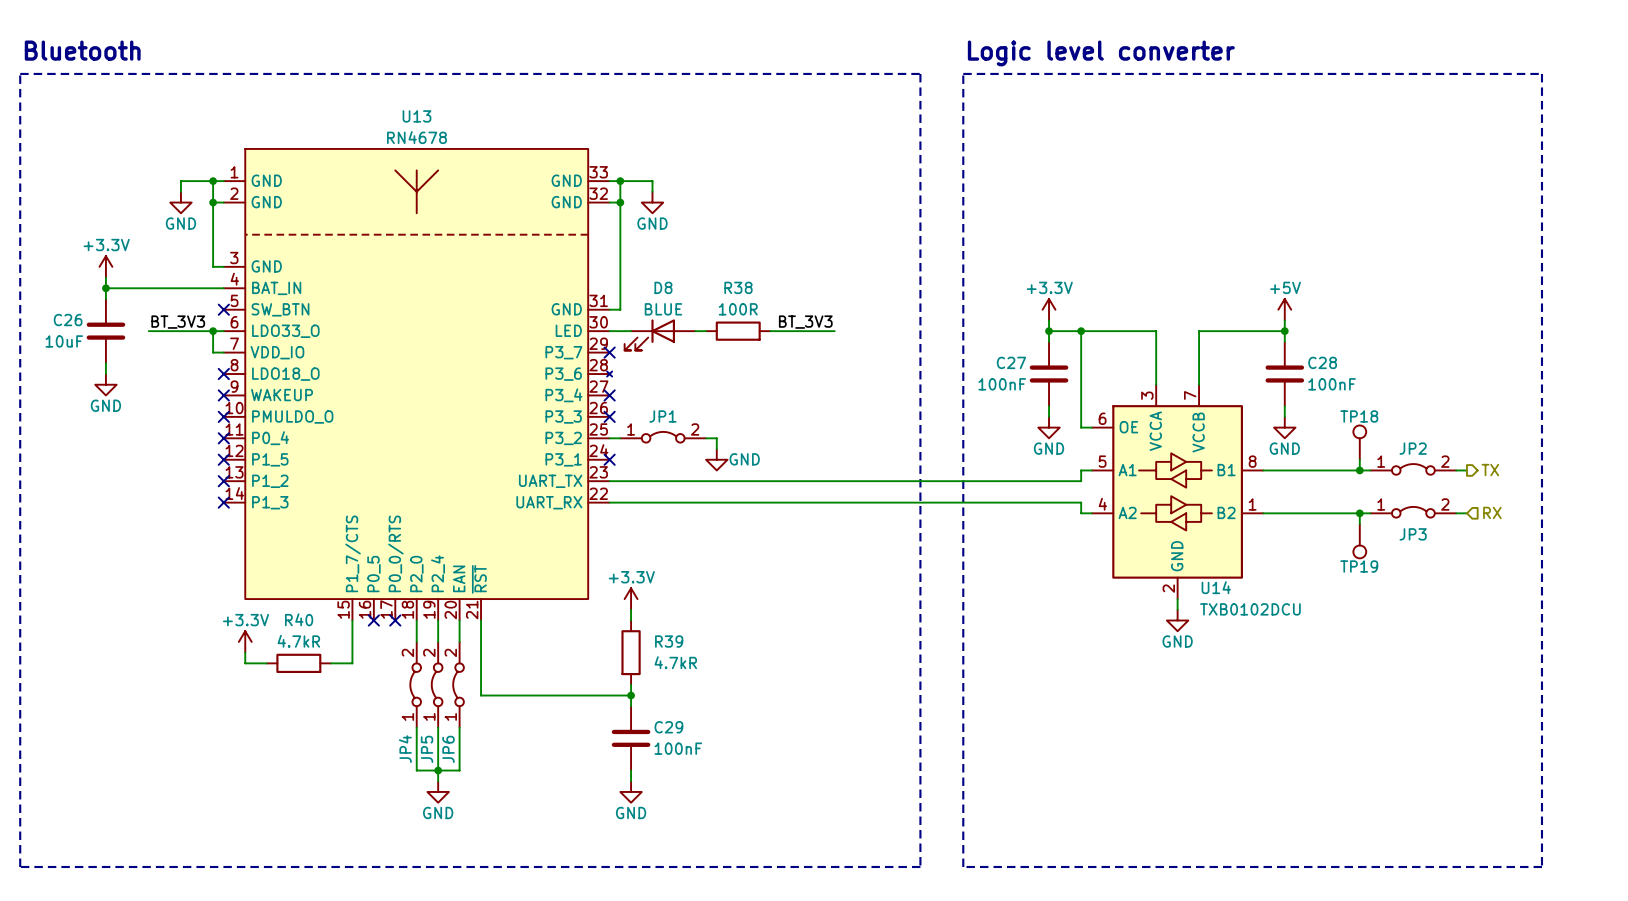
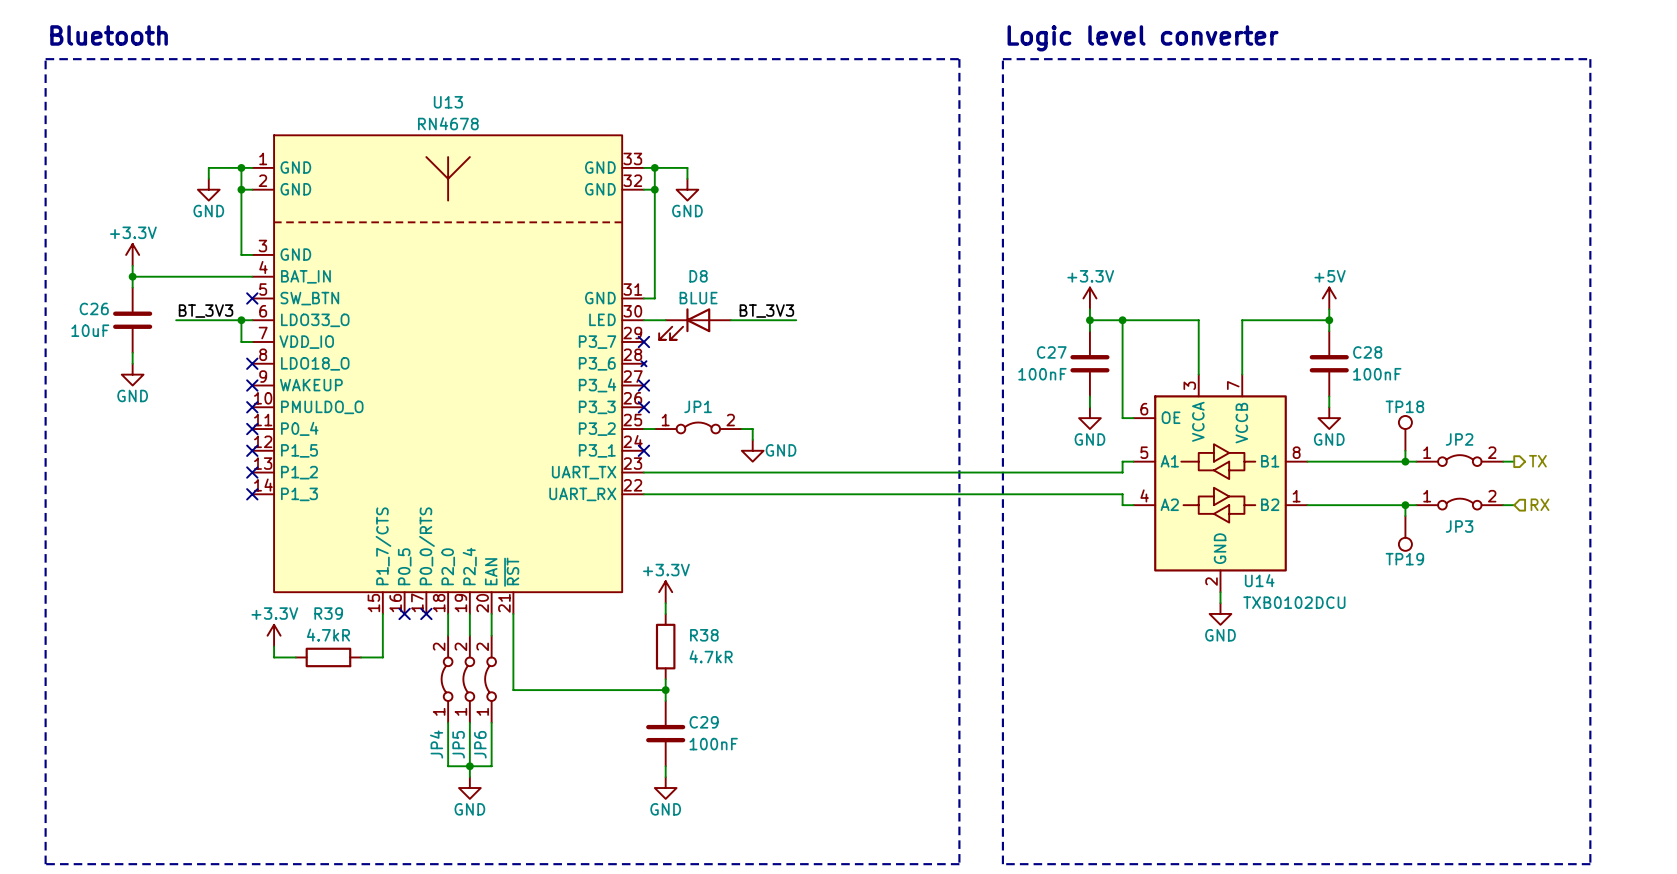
label position: BT_3V3 (805, 322) -> BT_3V3 (766, 311)
wire: none -> (741, 320) (796, 320)
R38: 100R (738, 331) -> none
wire: (770, 331) (834, 331) -> none
R40 name: R40 (299, 619) -> R39 (328, 613)
R39 name: R39 (669, 641) -> R38 (704, 635)

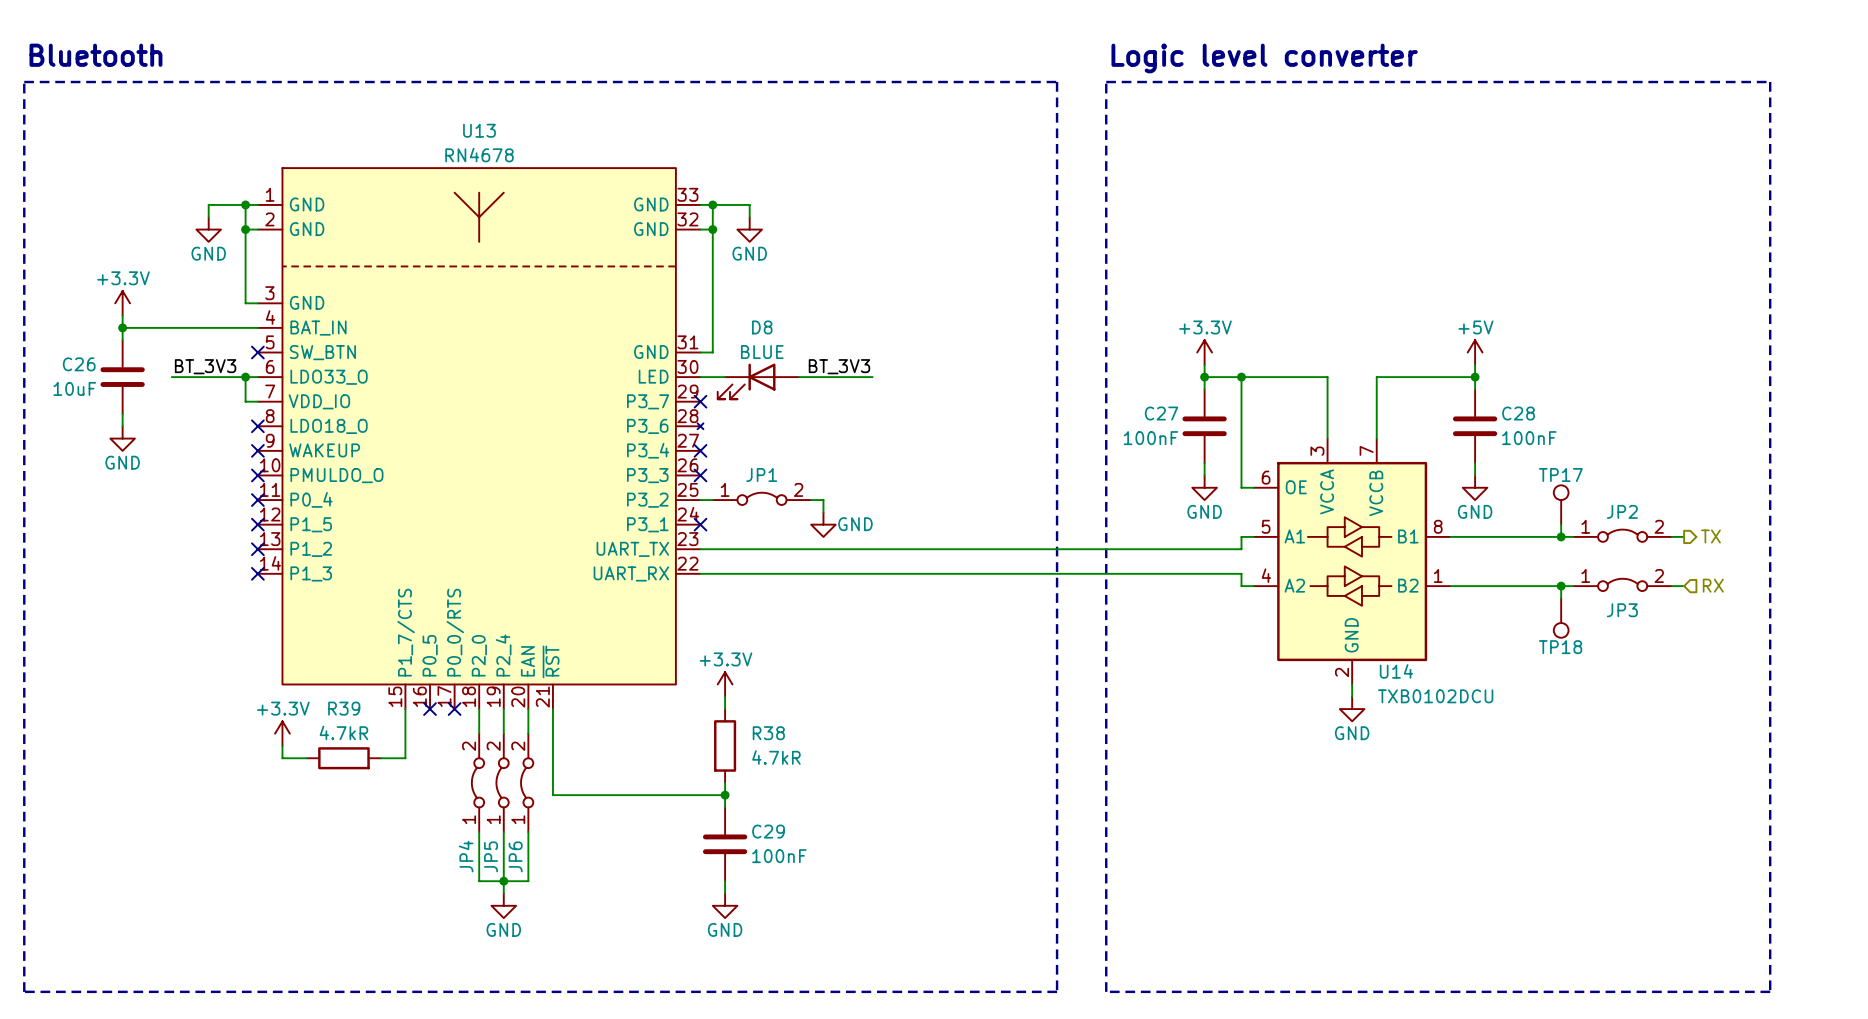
TP18 name: TP18 (1404, 406) -> TP17 (1560, 475)
TP19 name: TP19 (1404, 559) -> TP18 (1560, 647)

